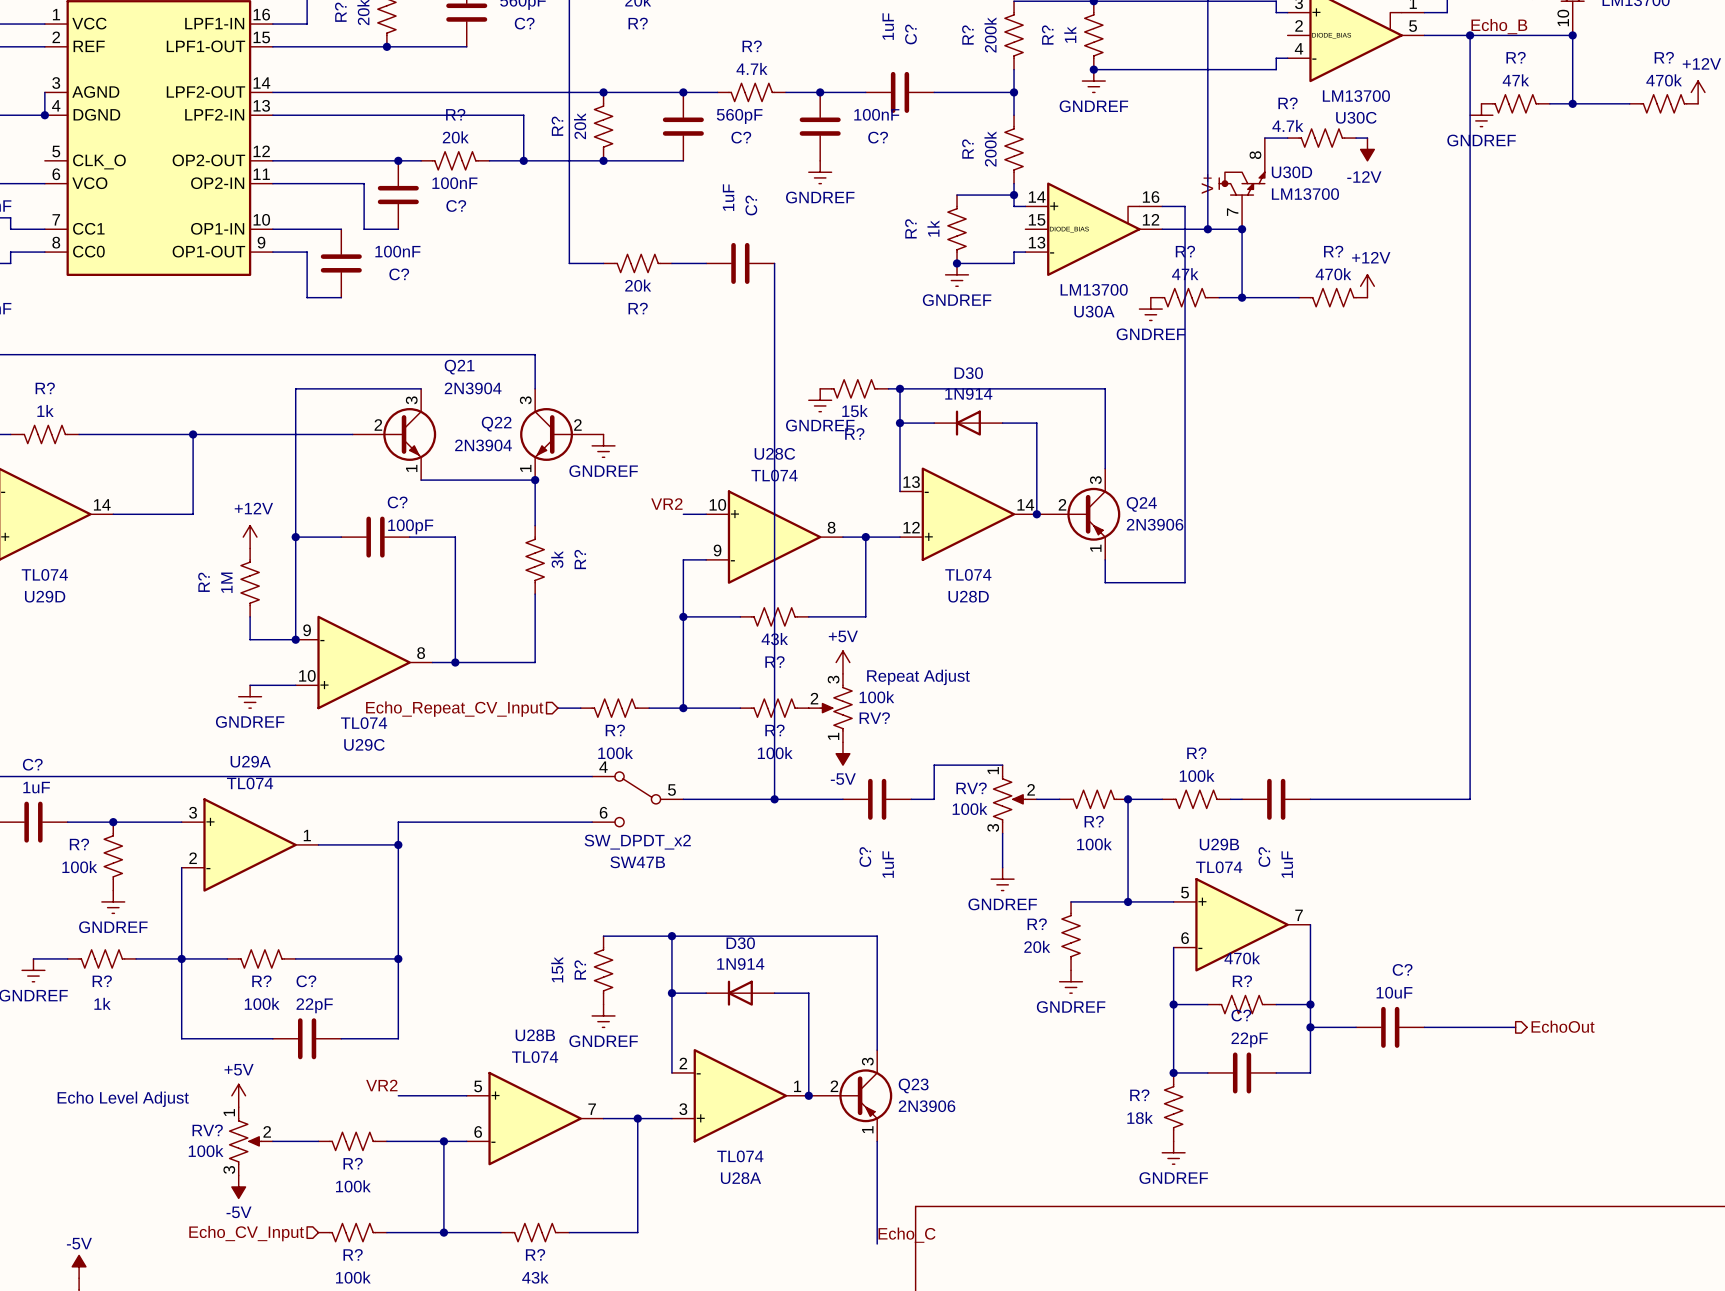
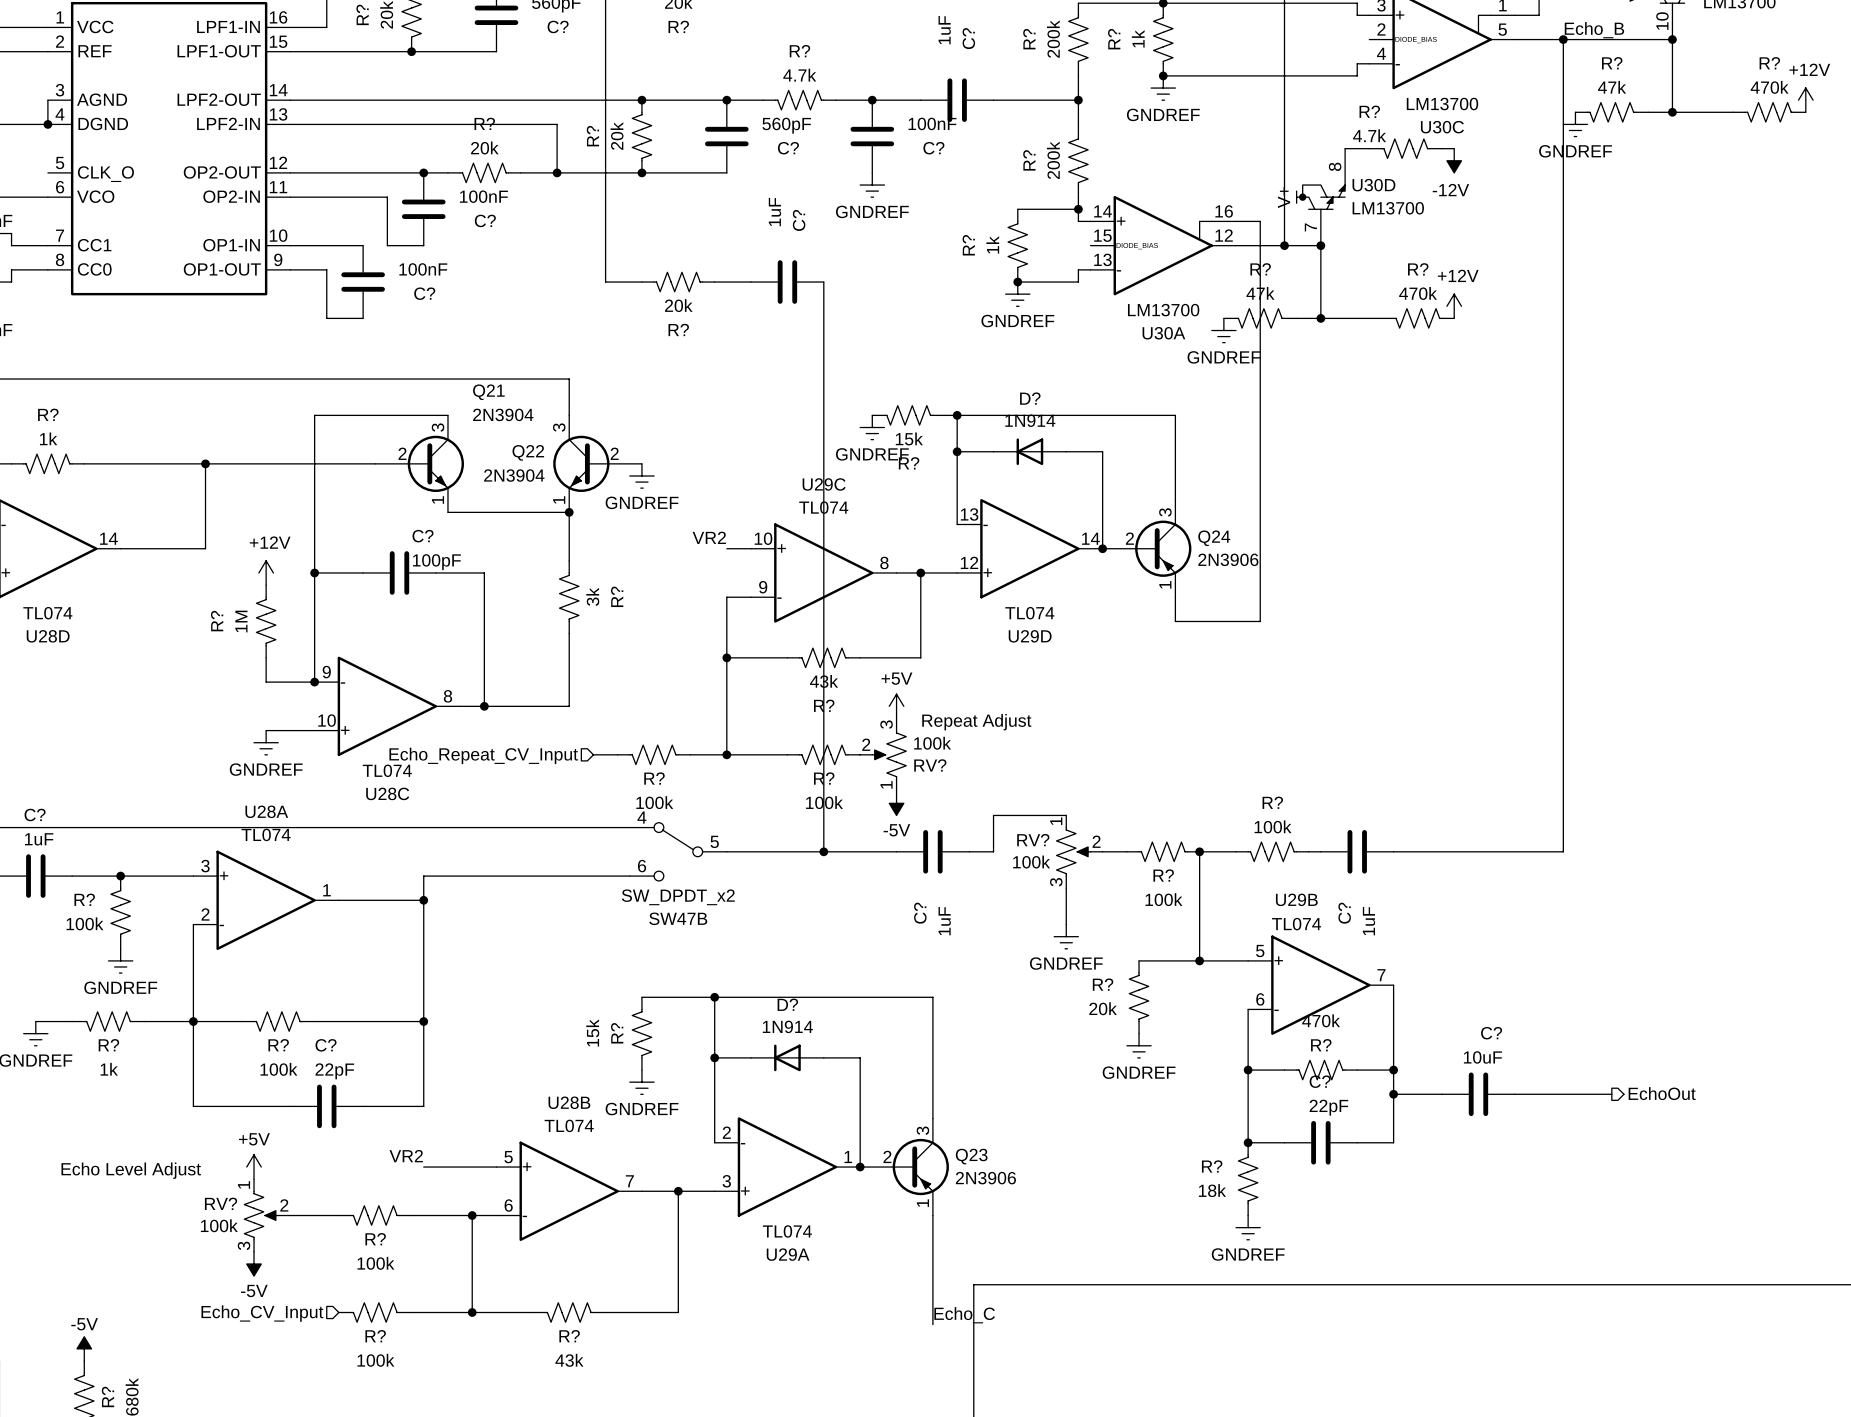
D30 name: D30 (968, 373) -> D? (1030, 398)
U28C name: U28C (774, 453) -> U29C (824, 484)
U29D name: U29D (45, 596) -> U28D (48, 636)
U28D name: U28D (968, 596) -> U29D (1030, 636)
U29C name: U29C (364, 744) -> U28C (387, 793)
U29A name: U29A (250, 761) -> U28A (266, 811)
D30 name: D30 (740, 943) -> D? (787, 1004)
U28A name: U28A (740, 1178) -> U29A (788, 1254)

